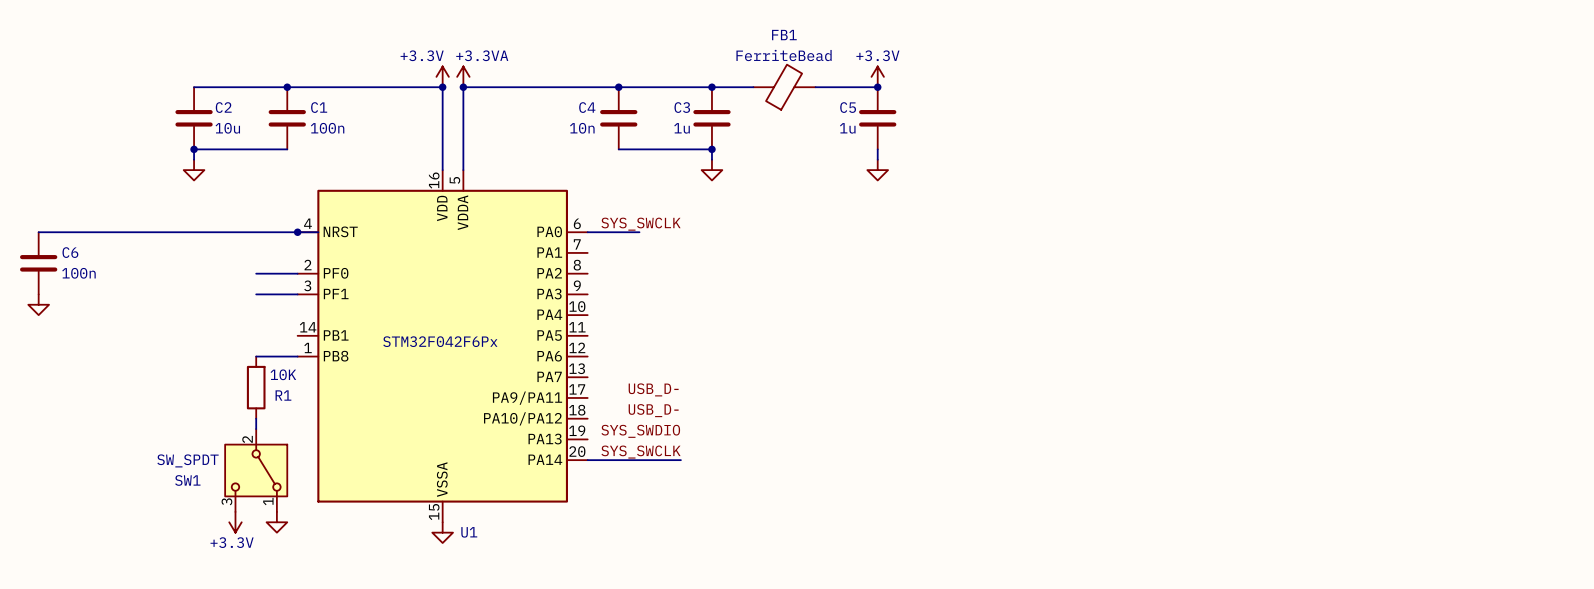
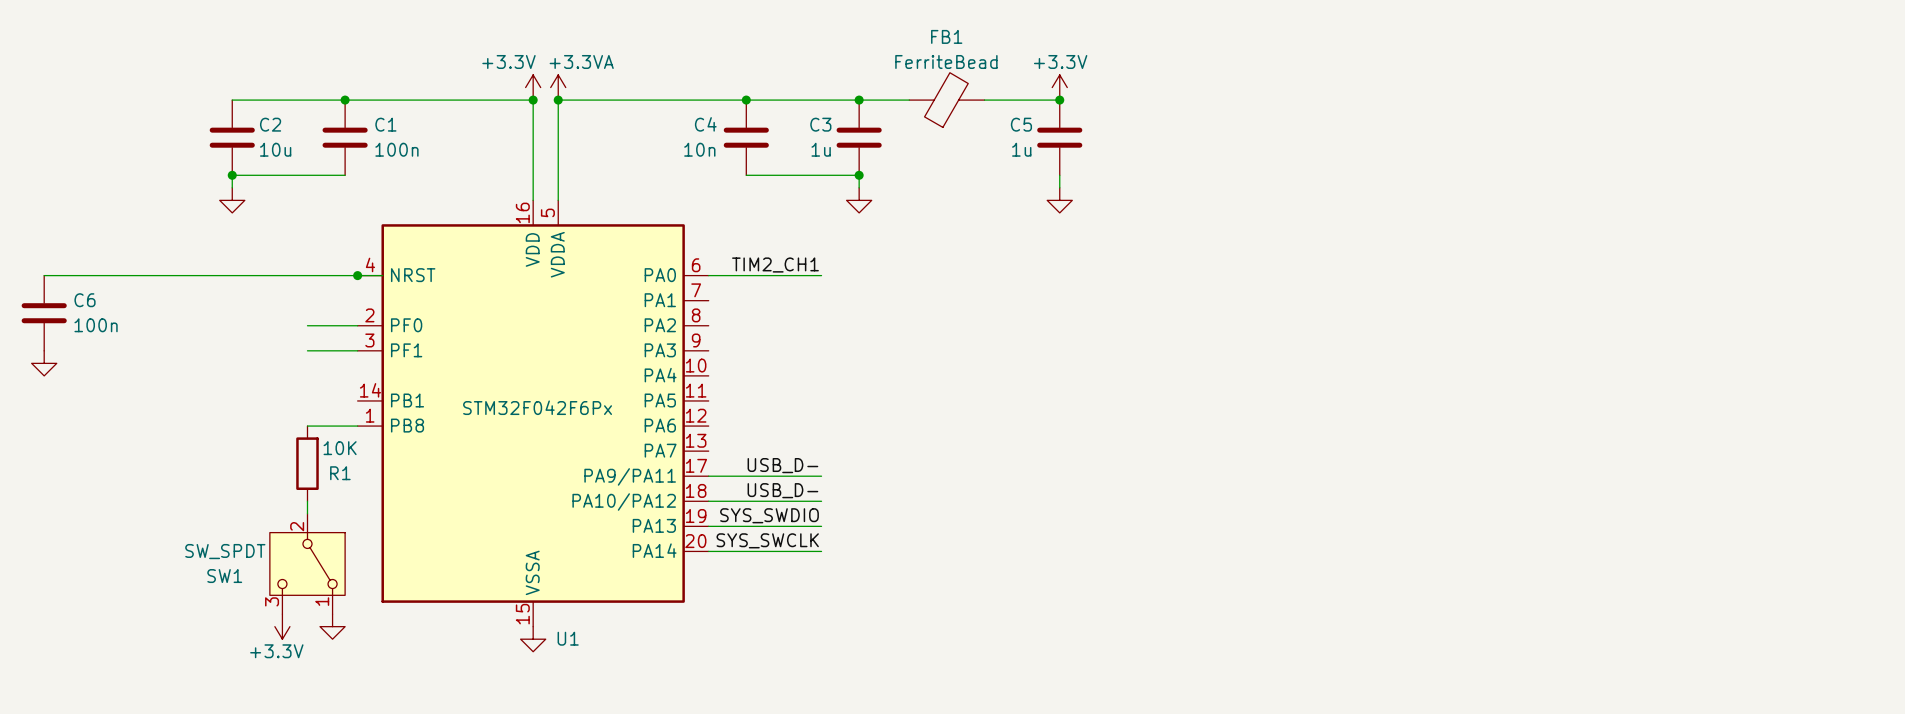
label: SYS_SWCLK (641, 224) -> TIM2_CH1 (775, 265)
wire: none -> (771, 275) (821, 275)
wire: none -> (708, 476) (821, 476)
wire: none -> (708, 501) (821, 501)
wire: none -> (708, 526) (821, 526)

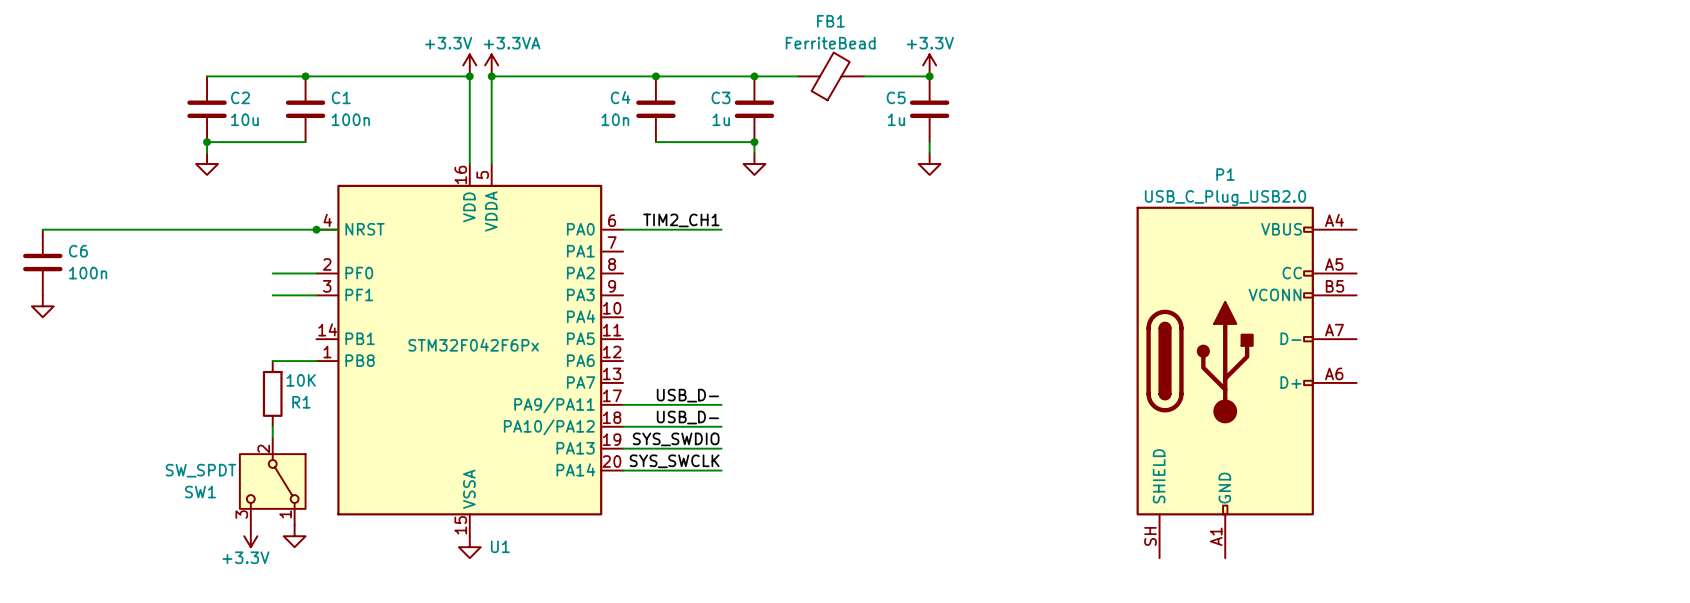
P1: none -> USB_C_Plug_USB2.0 (1246, 382)

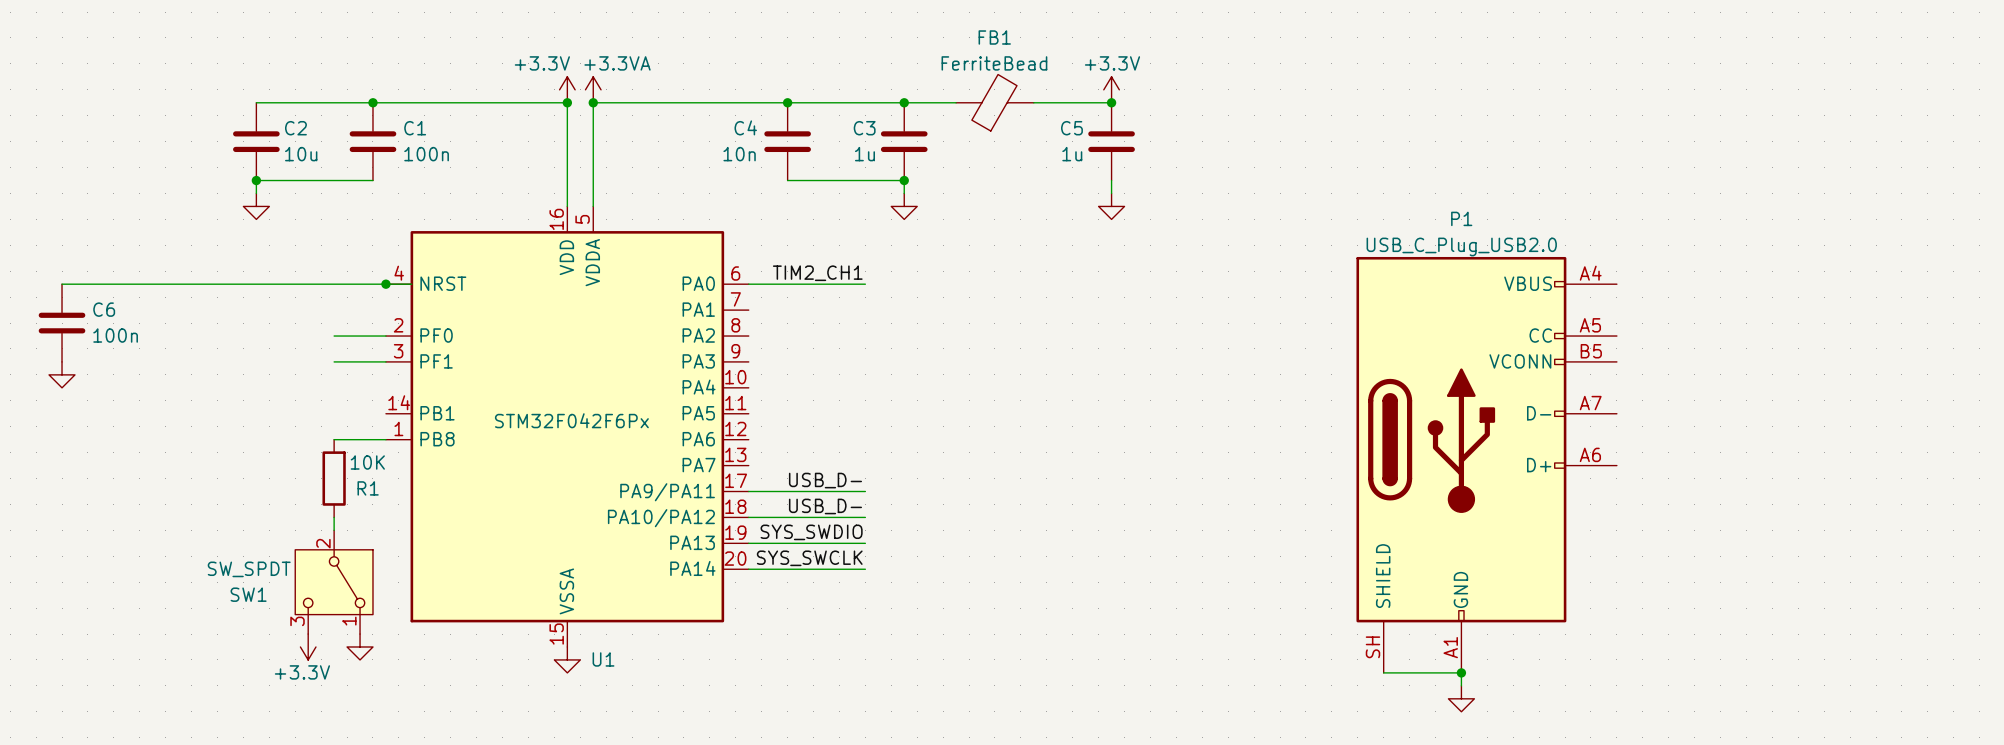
wire: none -> (1383, 672) (1461, 672) (1461, 685)
junction: none -> (1461, 672)
power symbol: none -> (1461, 698)

